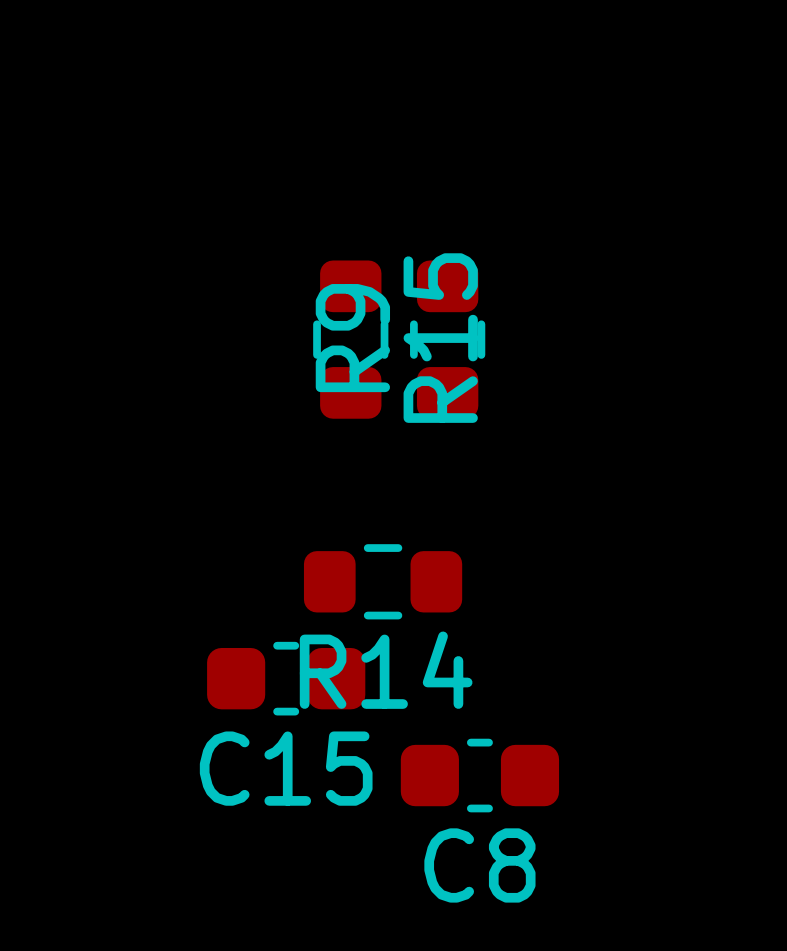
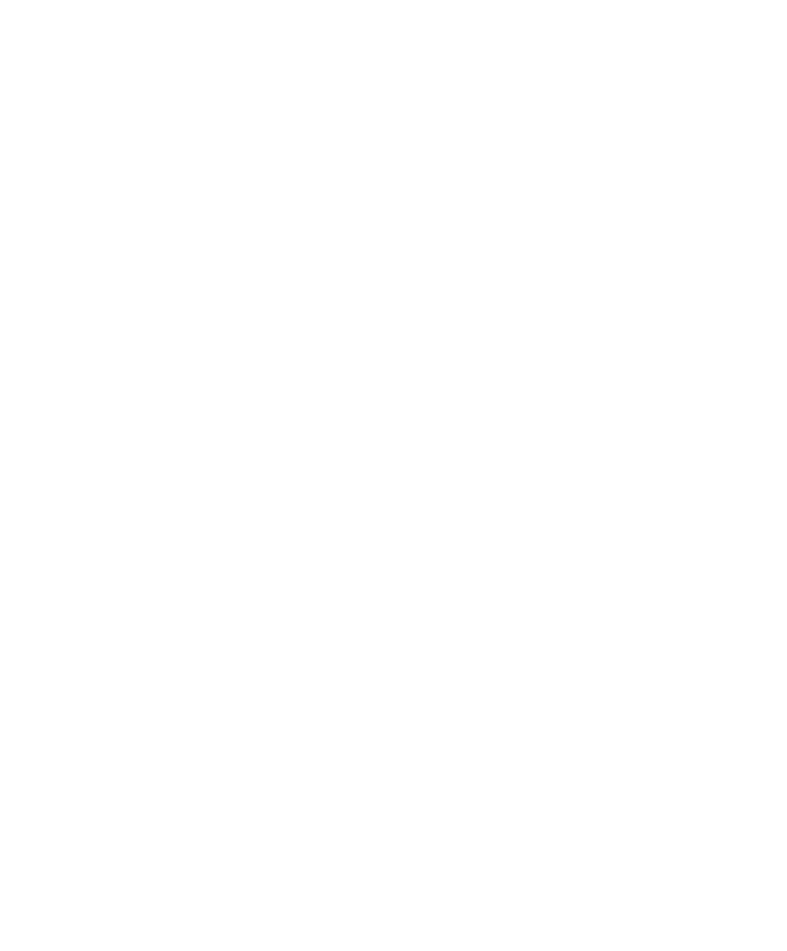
R15: (350, 339) -> none
R9: (447, 339) -> none
R14: (383, 581) -> none
C15: (286, 678) -> none
C8: (479, 775) -> none

